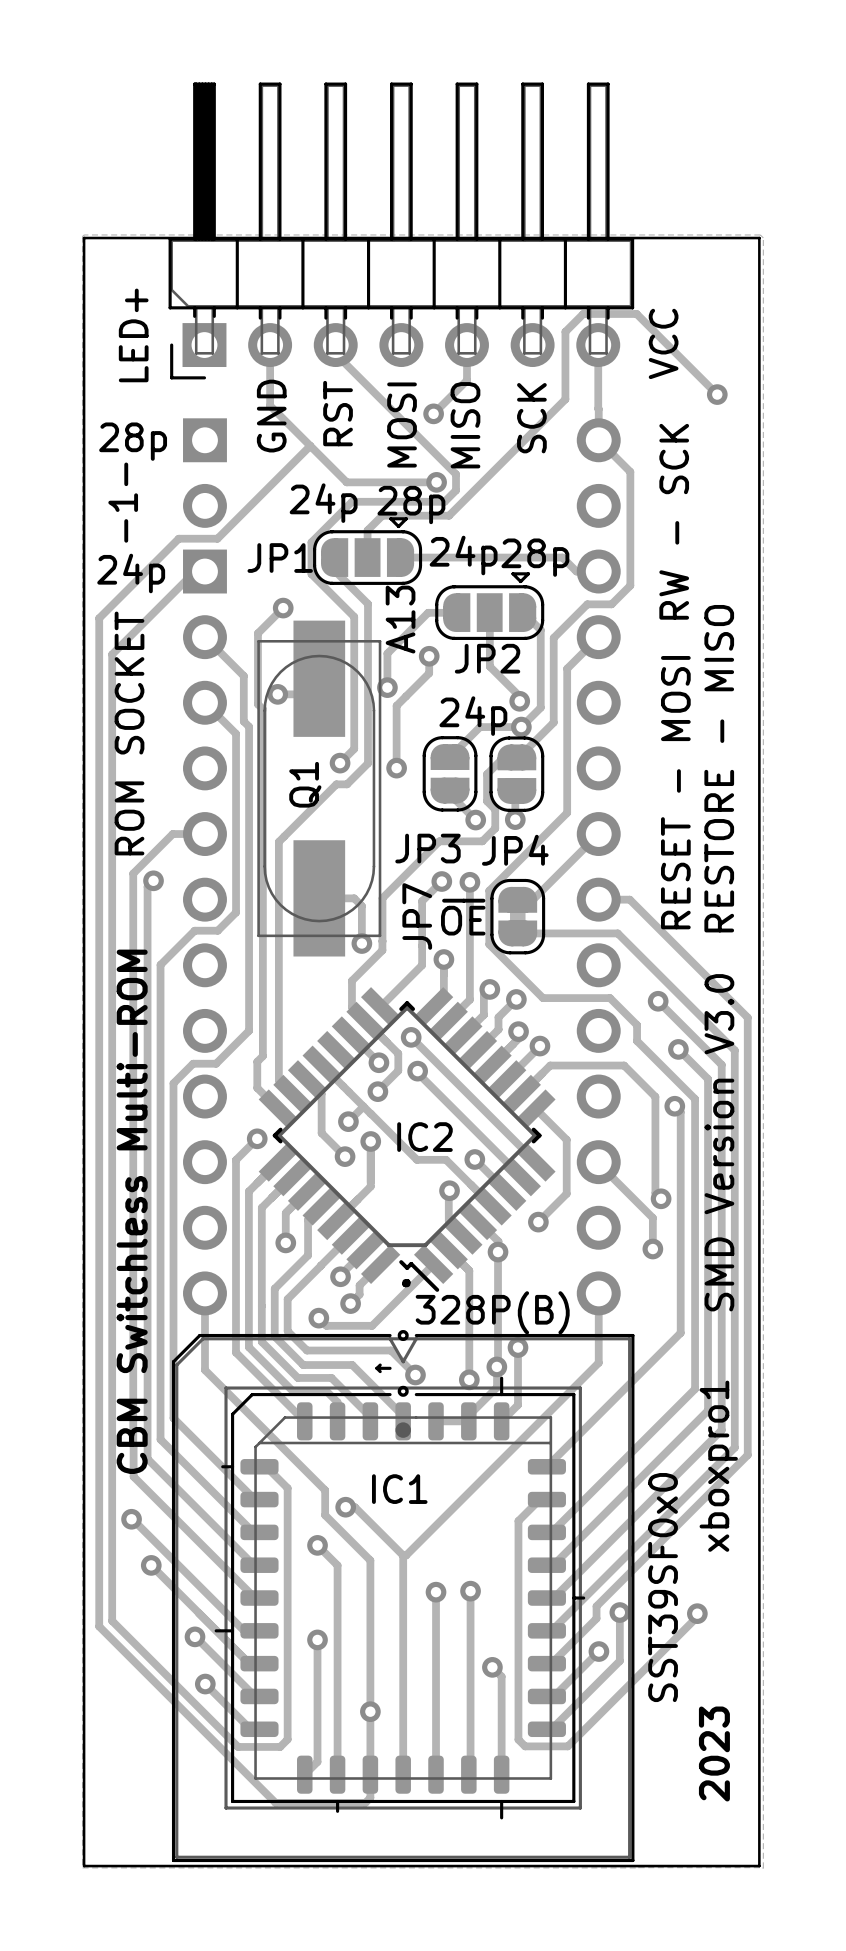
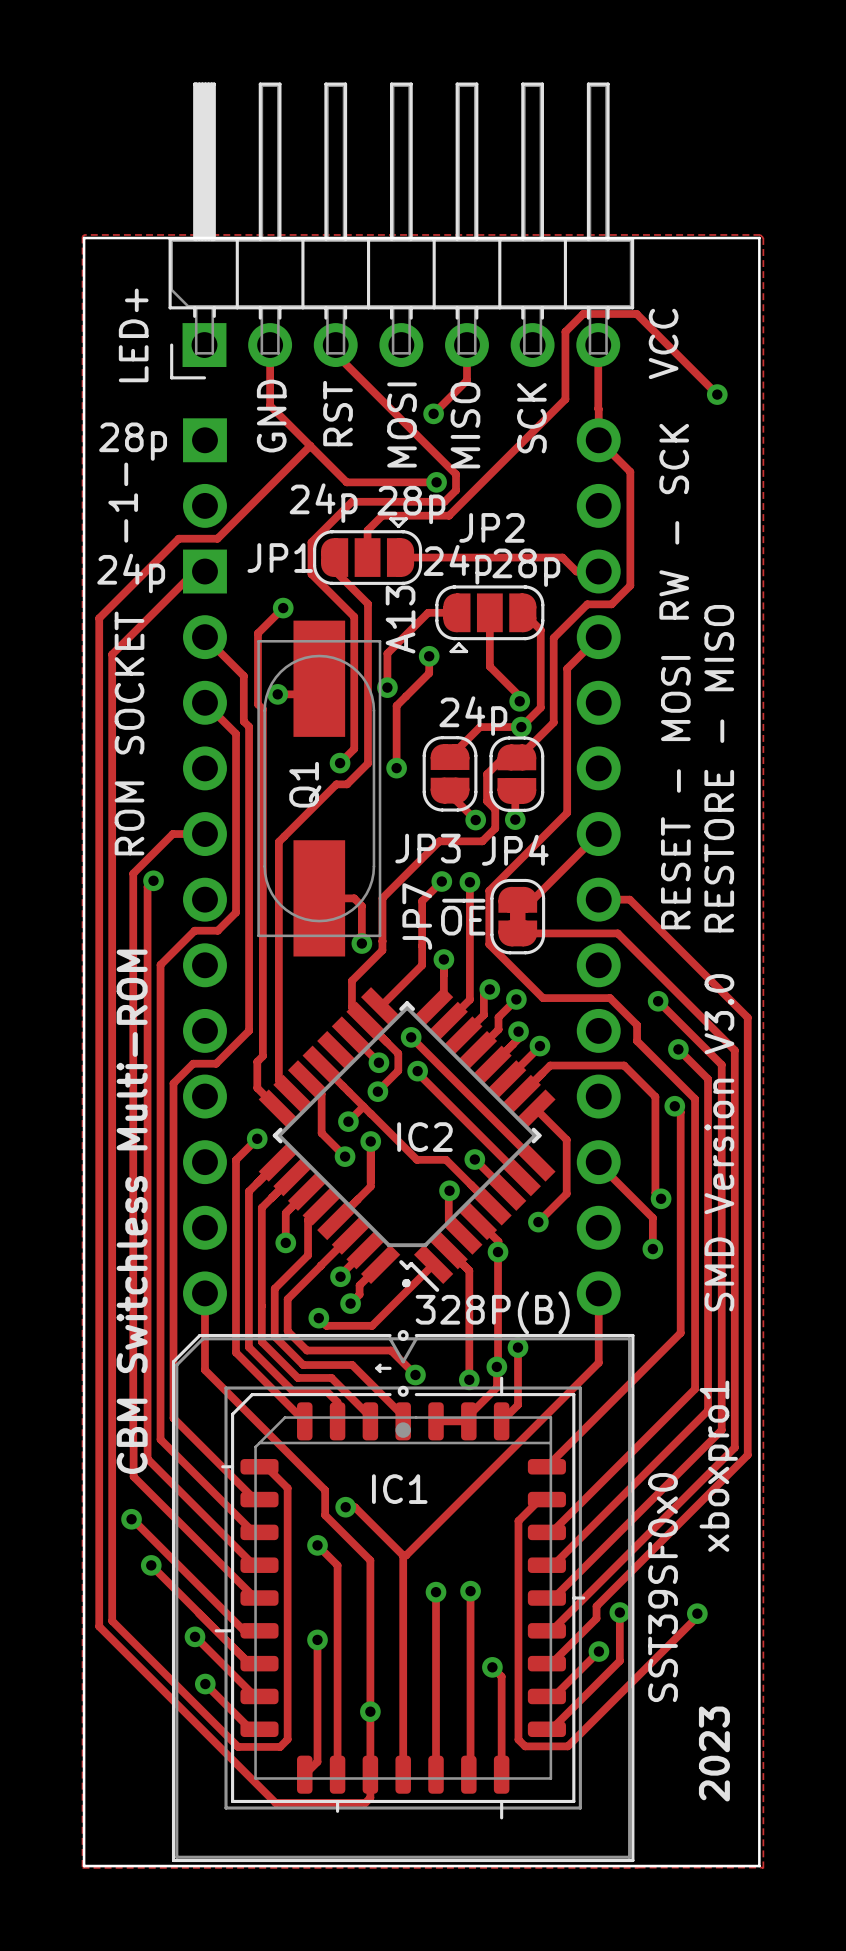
JP2 footprint: [435, 572, 545, 640] -> [435, 585, 545, 654]
JP2 name position: JP2 (487, 658) -> JP2 (492, 527)

